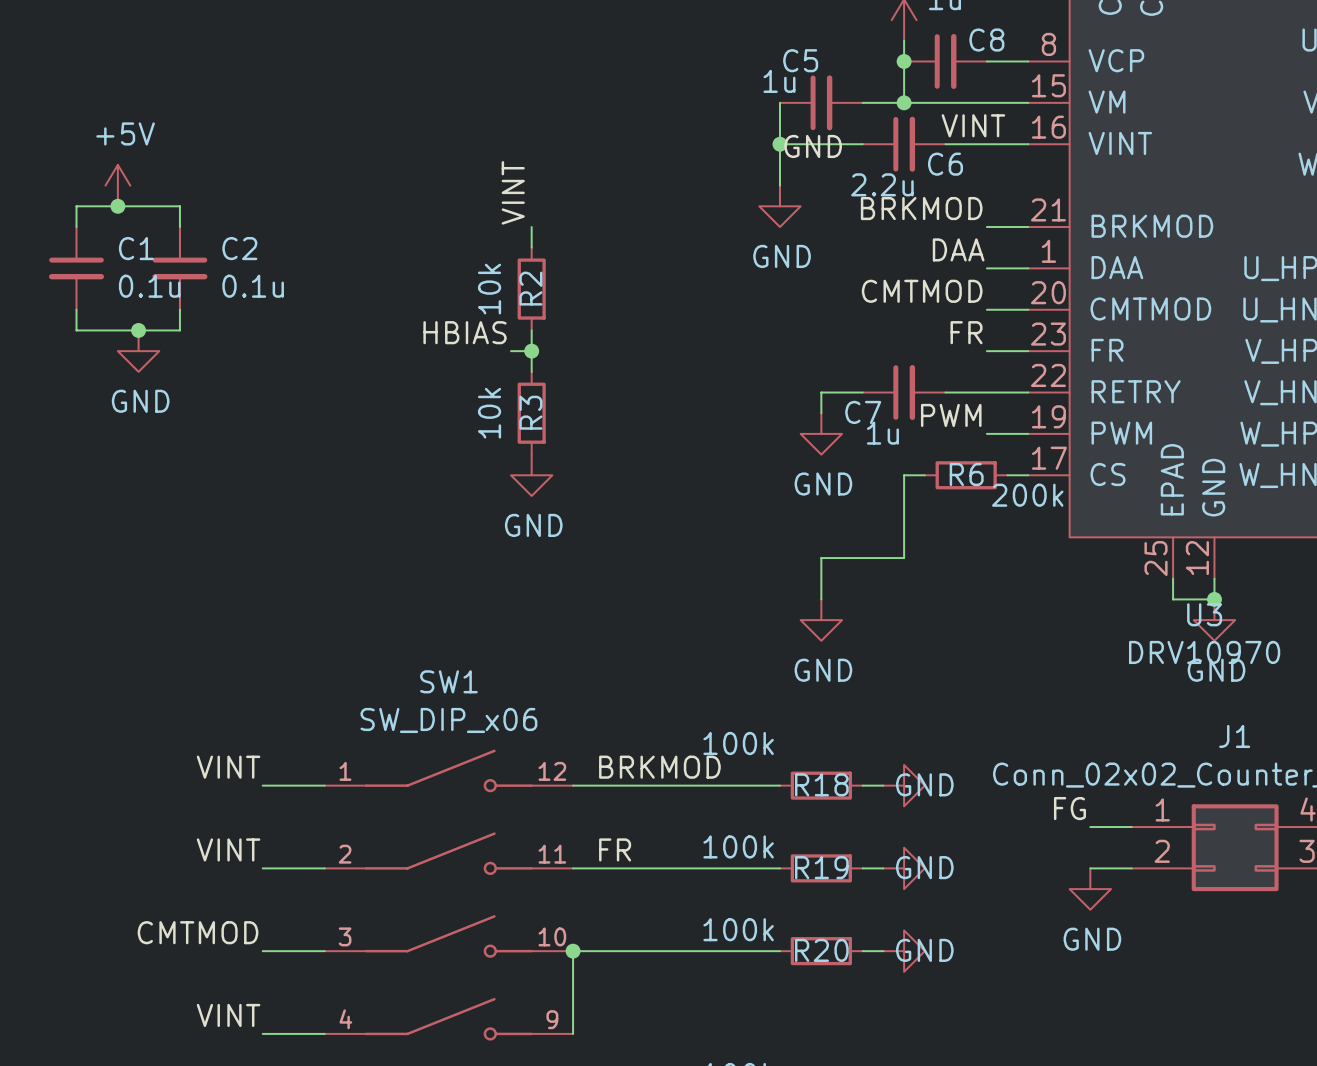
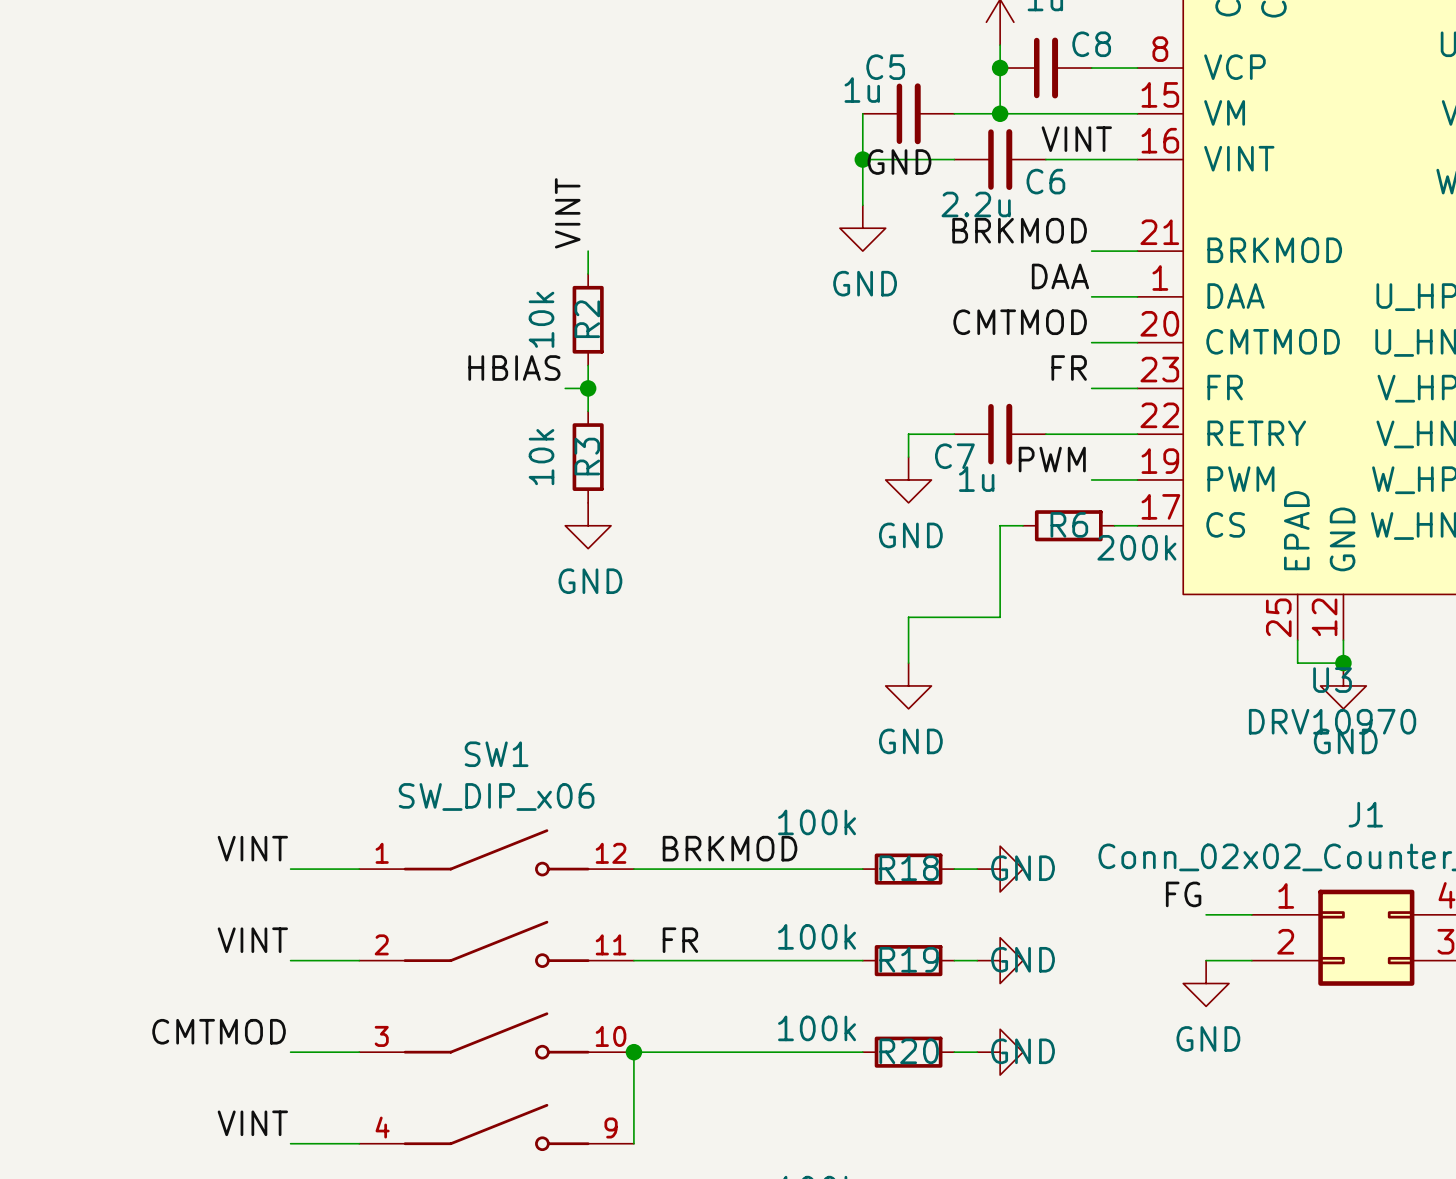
power symbol: +5V (117, 185) -> none
junction: (117, 206) -> none
wire: (76, 227) (76, 206) (179, 206) (179, 227) -> none
C1: 0.1u (76, 268) -> none
C2: 0.1u (179, 268) -> none
wire: (76, 309) (76, 330) (179, 330) (179, 309) -> none
junction: (138, 330) -> none
power symbol: GND (138, 351) -> none

